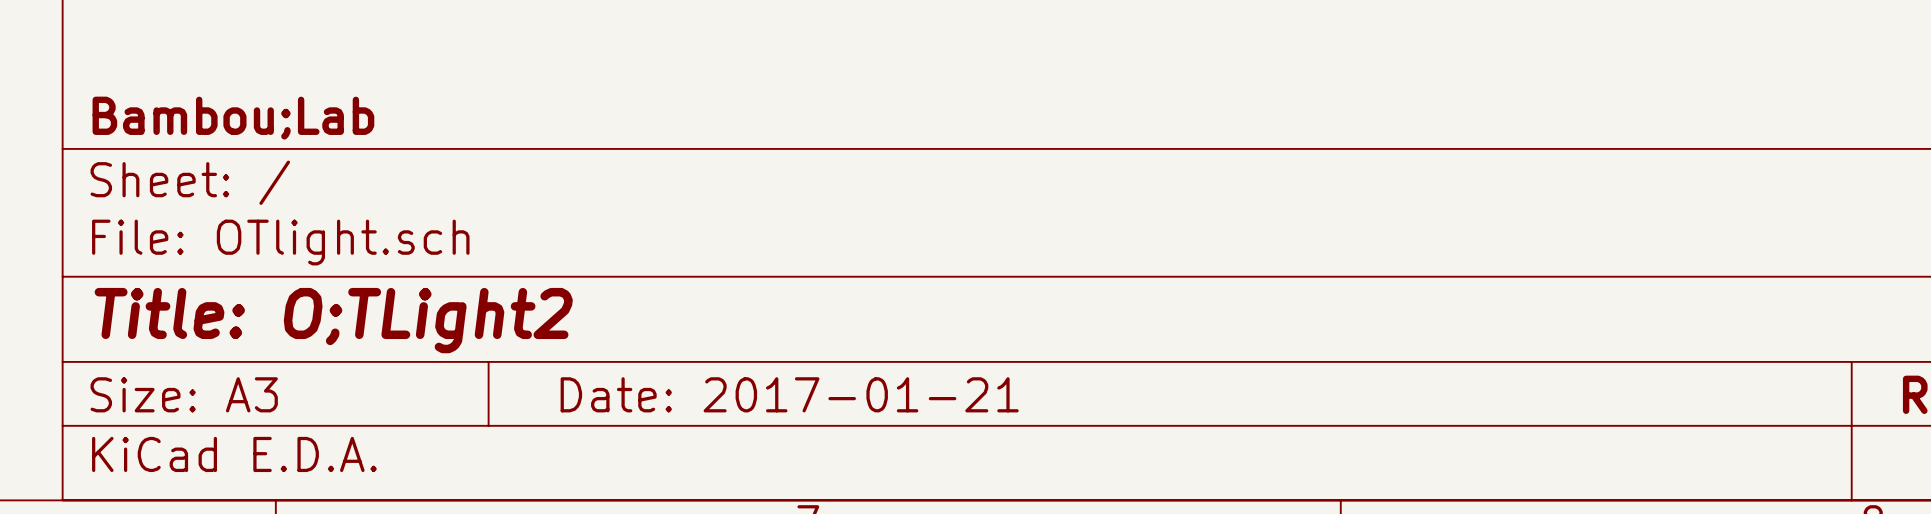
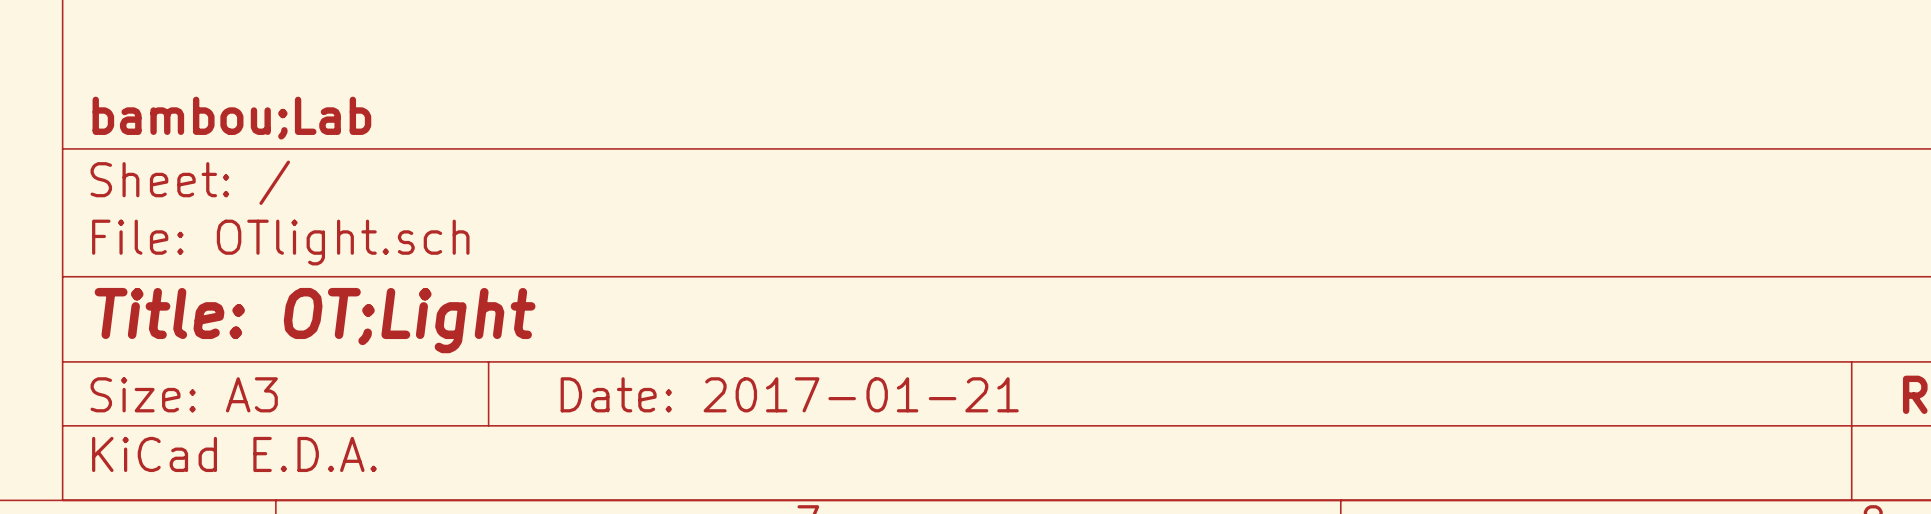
title block: Bambou;Lab (233, 118) -> bambou;Lab (231, 118)
title block: Title: O;TLight2 (333, 320) -> Title: OT;Light (315, 320)

